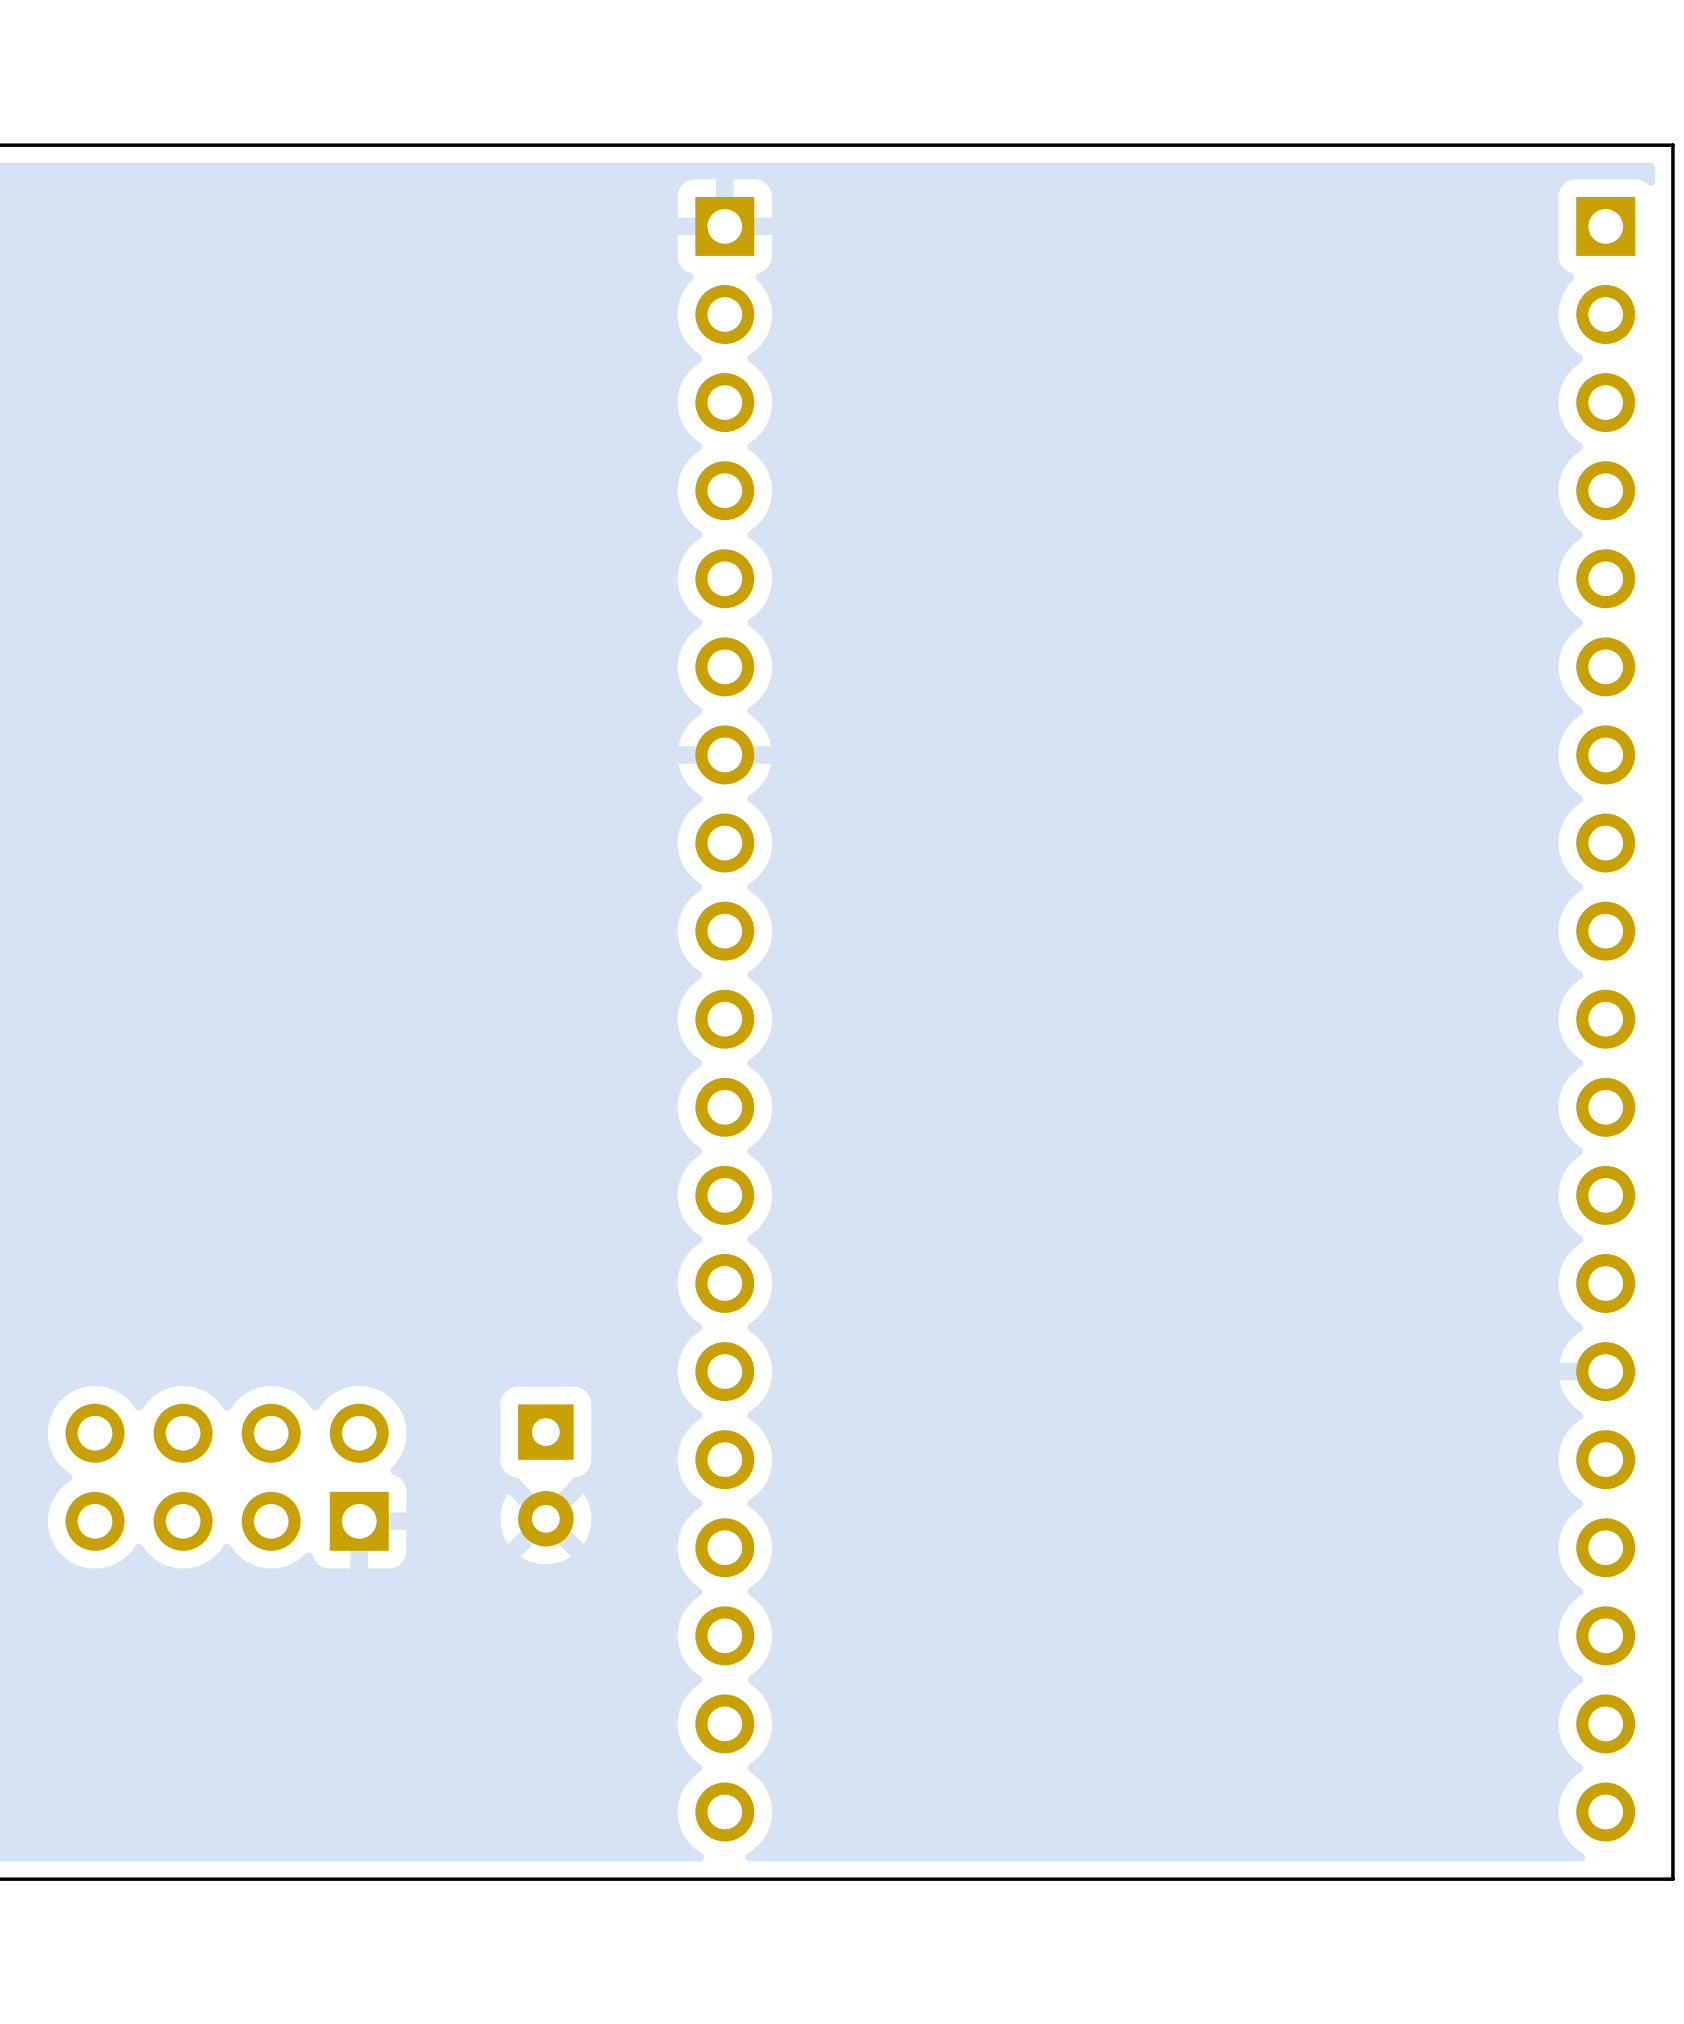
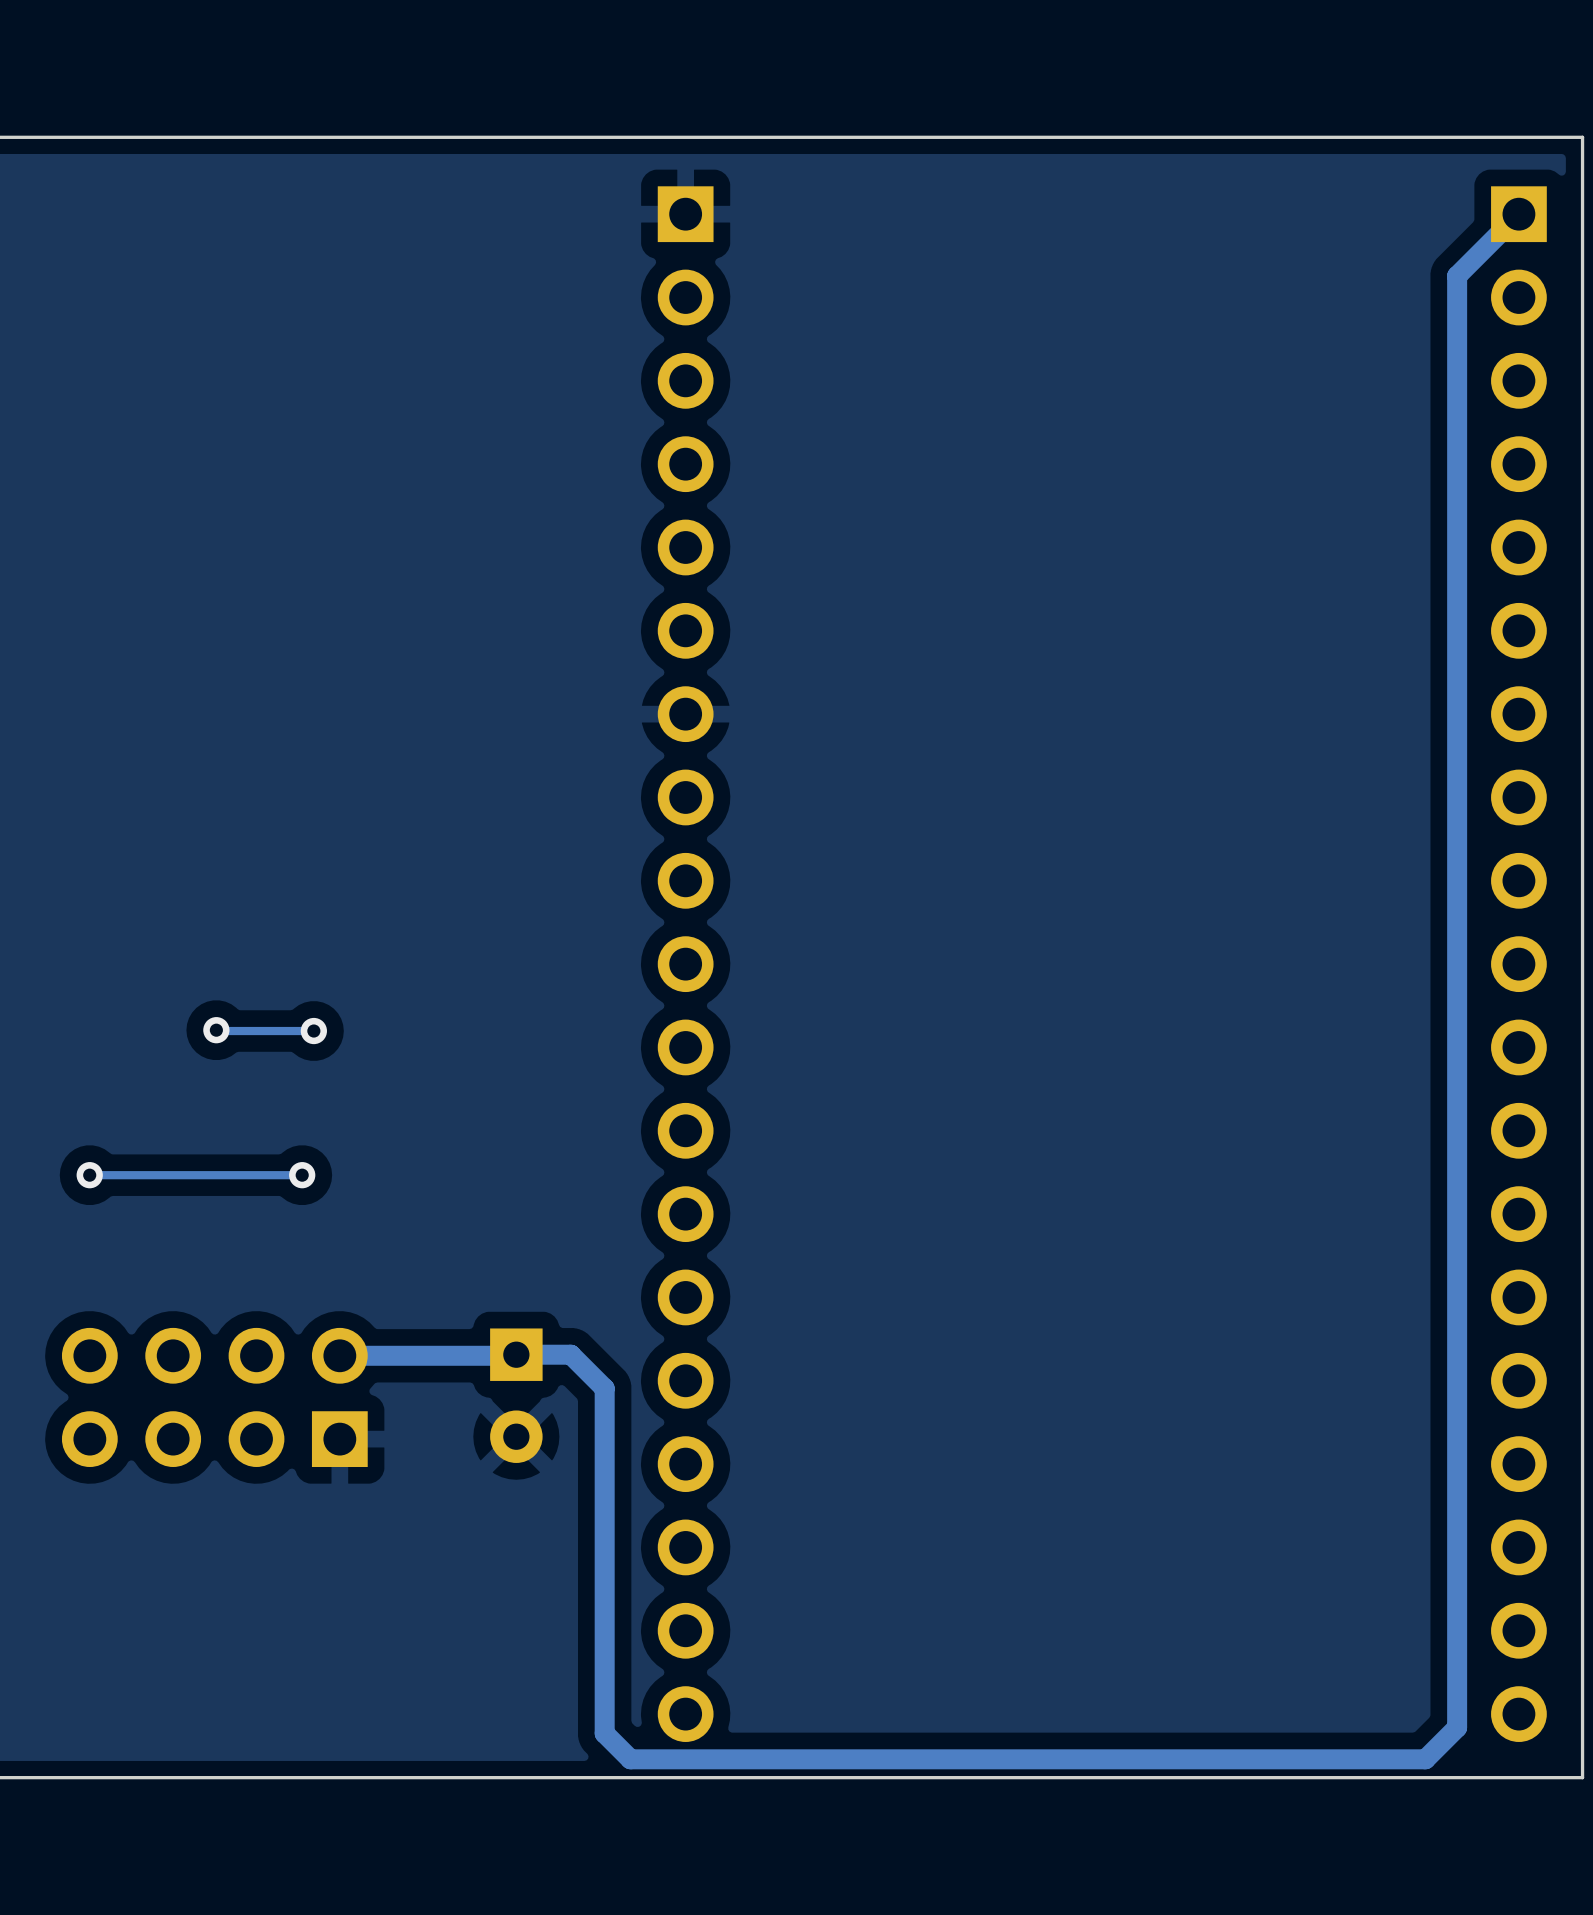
track: none -> (1518, 214) (1457, 275) (1457, 1727) (1425, 1759) (630, 1759) (604, 1733) (604, 1388) (570, 1354) (339, 1355)
track: none -> (216, 1030) (313, 1031)
via: none -> (216, 1030)
via: none -> (313, 1031)
via: none -> (89, 1175)
track: none -> (302, 1175) (89, 1175)
via: none -> (302, 1175)

